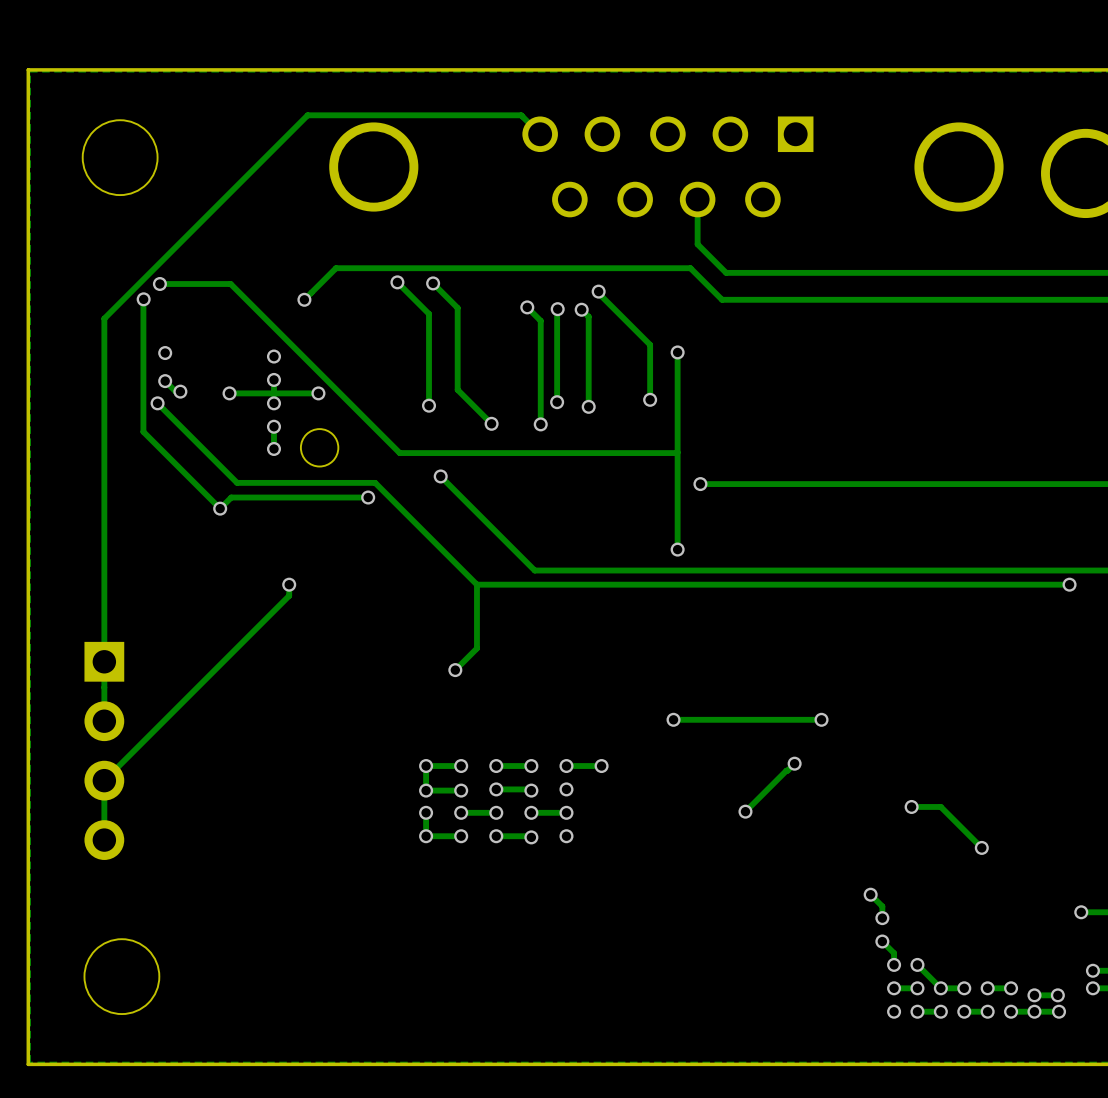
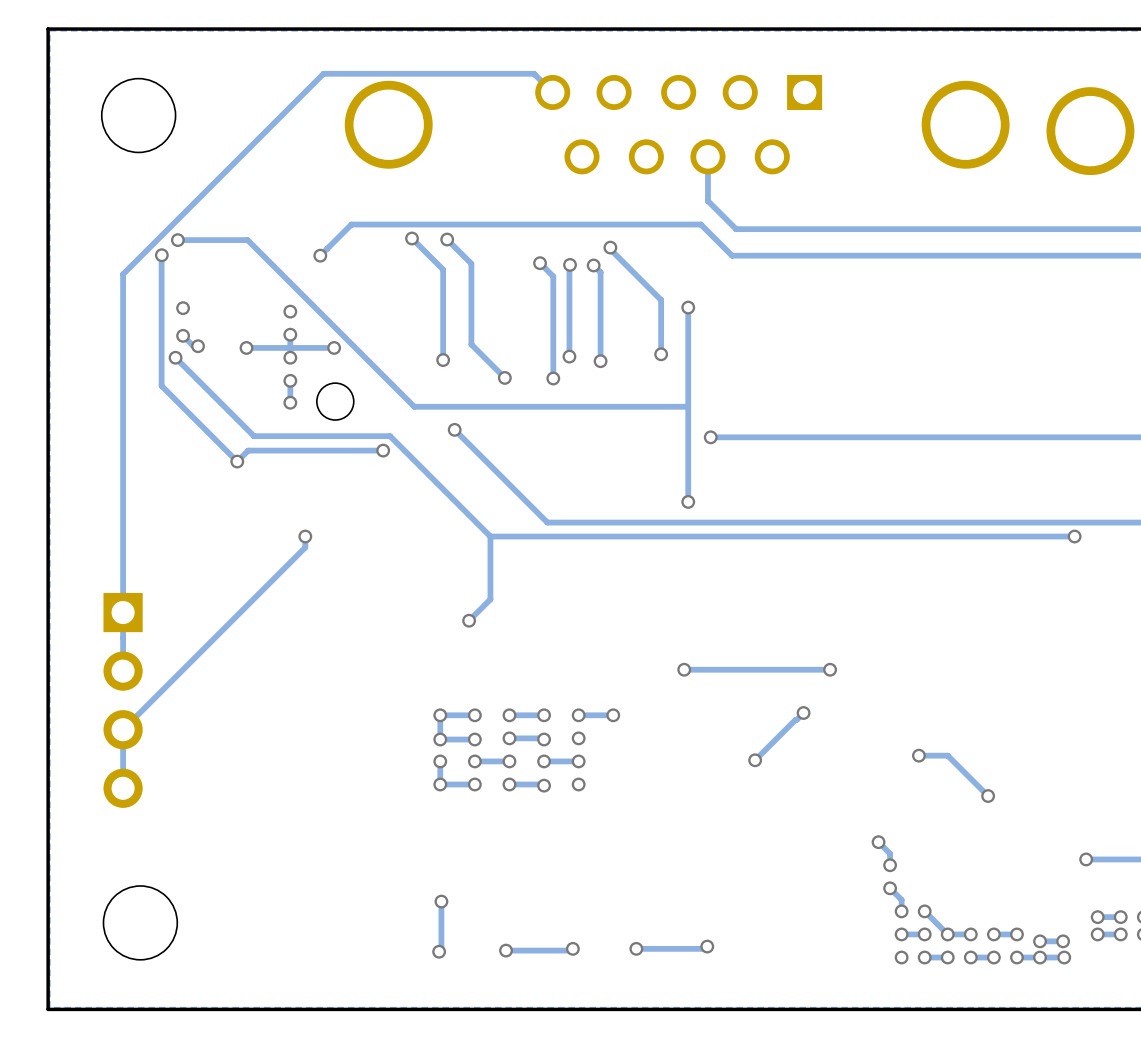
track: none -> (441, 901) (441, 949) (439, 951)
via: none -> (441, 901)
track: none -> (707, 946) (704, 948) (636, 948)
via: none -> (707, 946)
track: none -> (572, 948) (571, 950) (506, 950)
via: none -> (572, 948)
via: none -> (636, 948)
via: none -> (506, 950)
via: none -> (439, 951)

